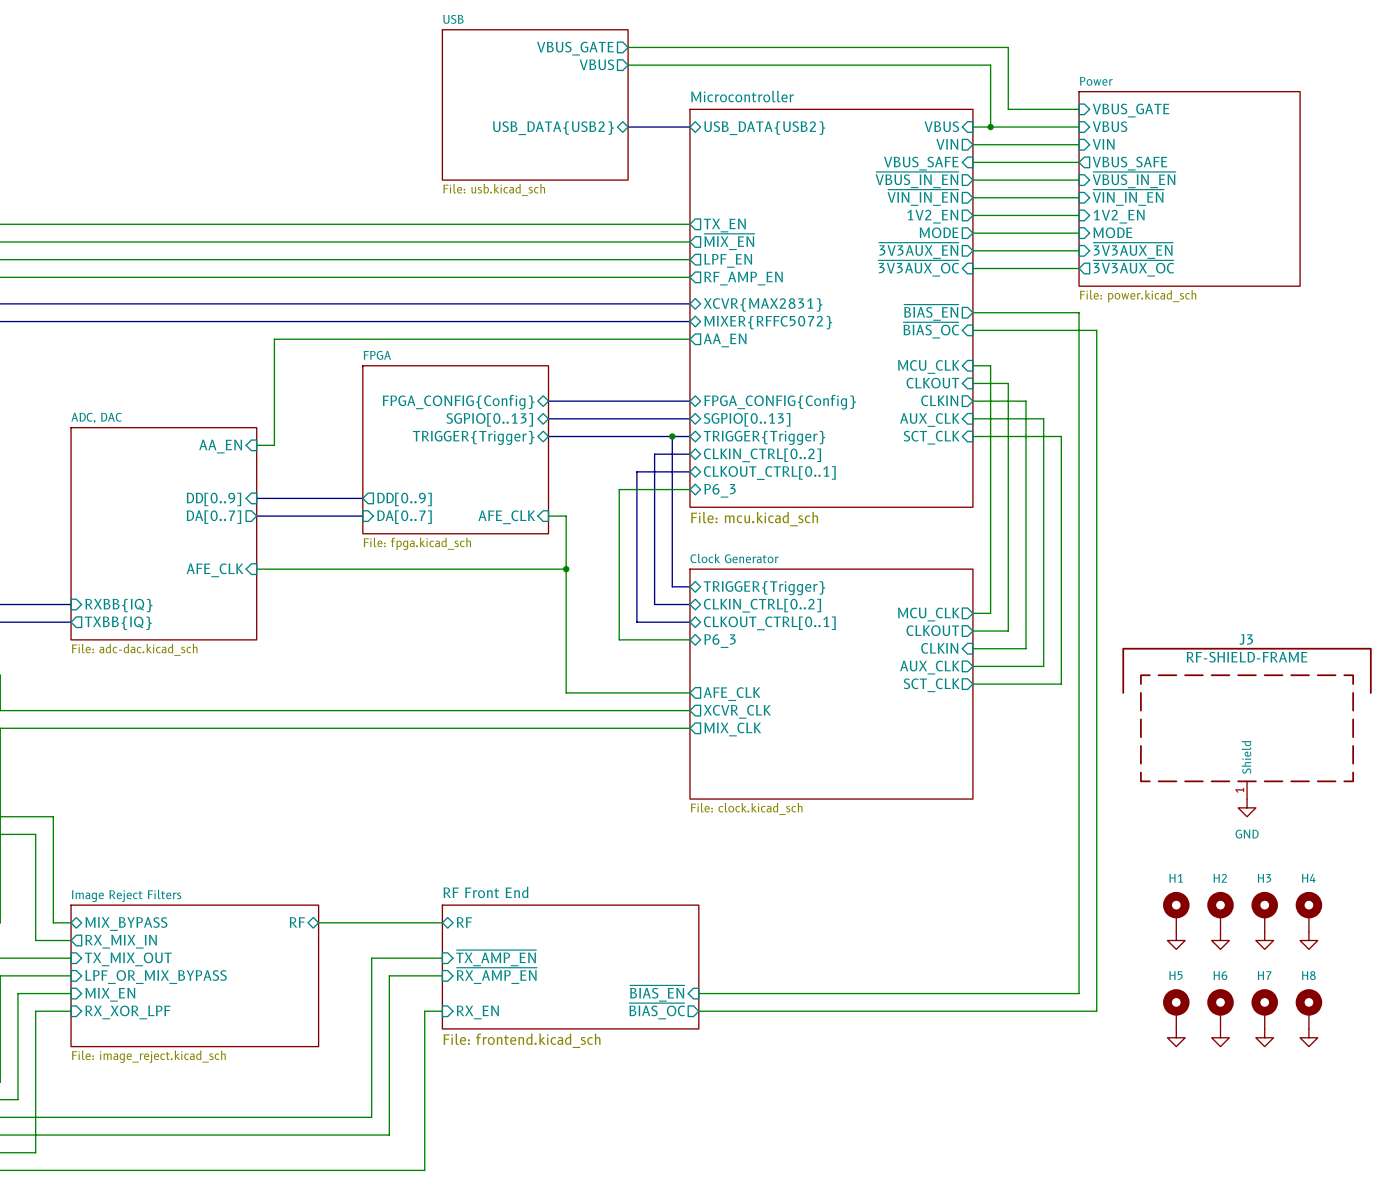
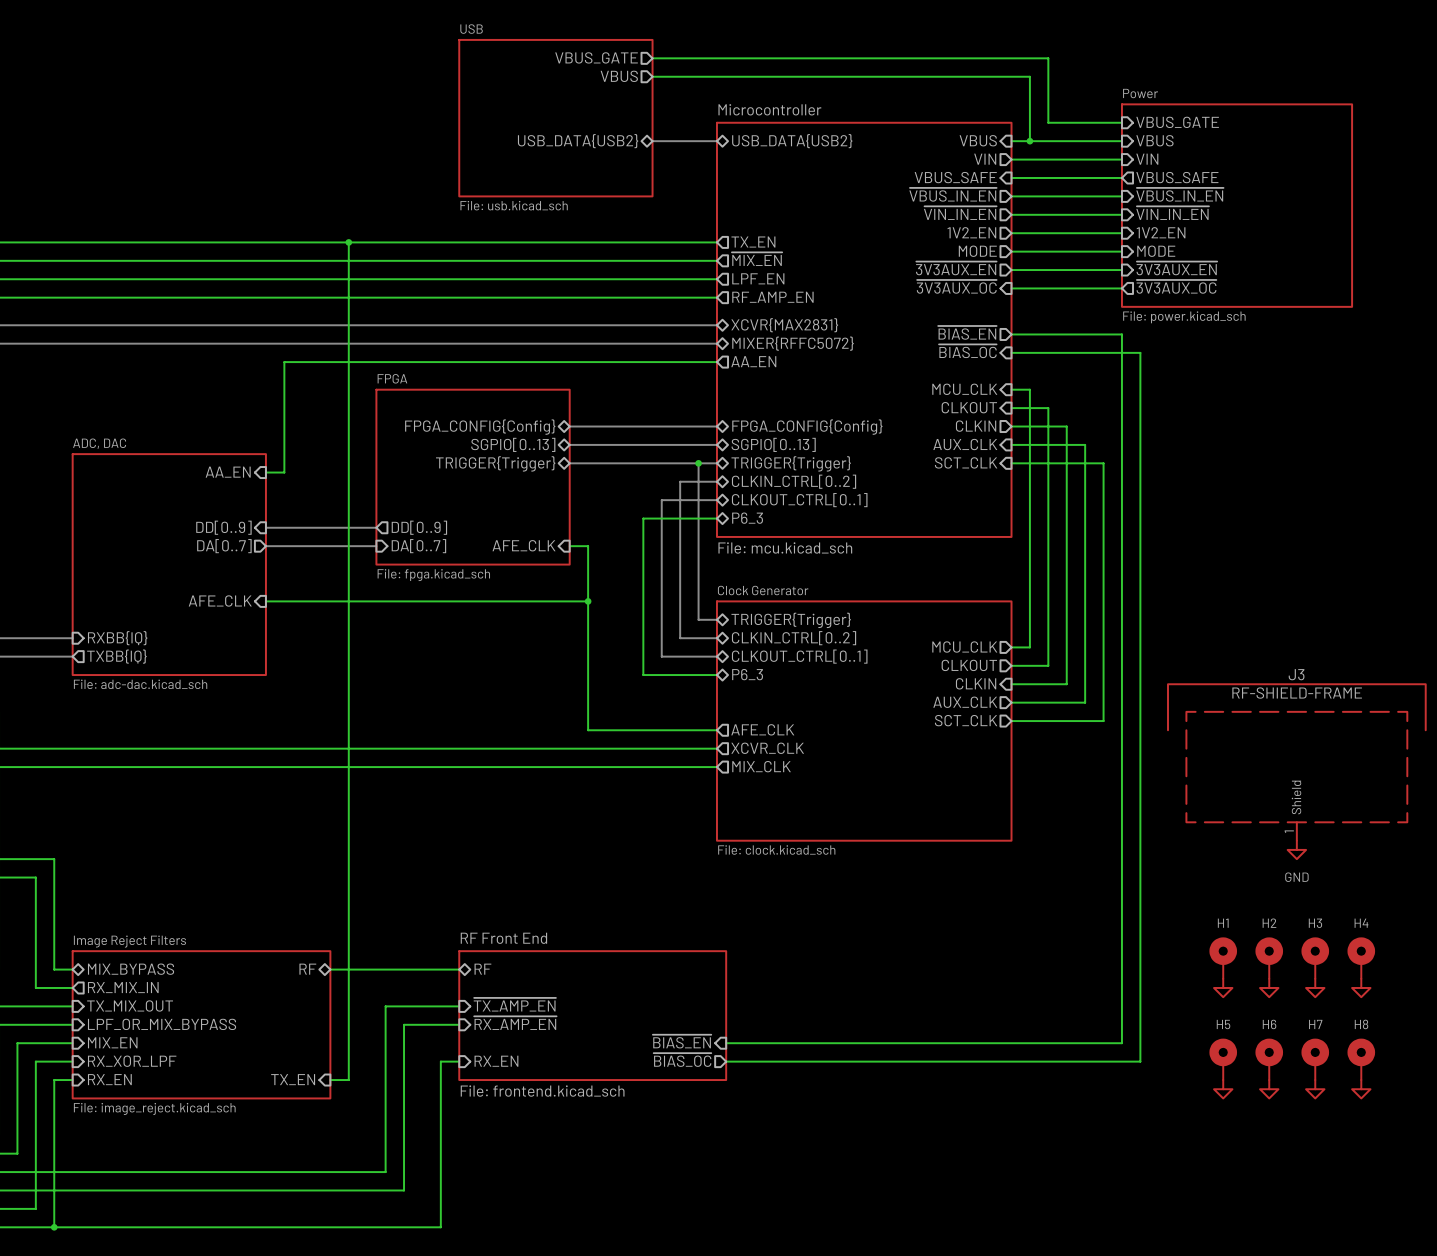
wire: none -> (348, 242) (348, 1080) (330, 1080)
junction: none -> (348, 242)
wire: none -> (72, 1080) (54, 1080) (54, 1227)
sheet pin: none -> RX_EN (109, 1079)
sheet pin: none -> TX_EN (293, 1079)
junction: none -> (54, 1227)

